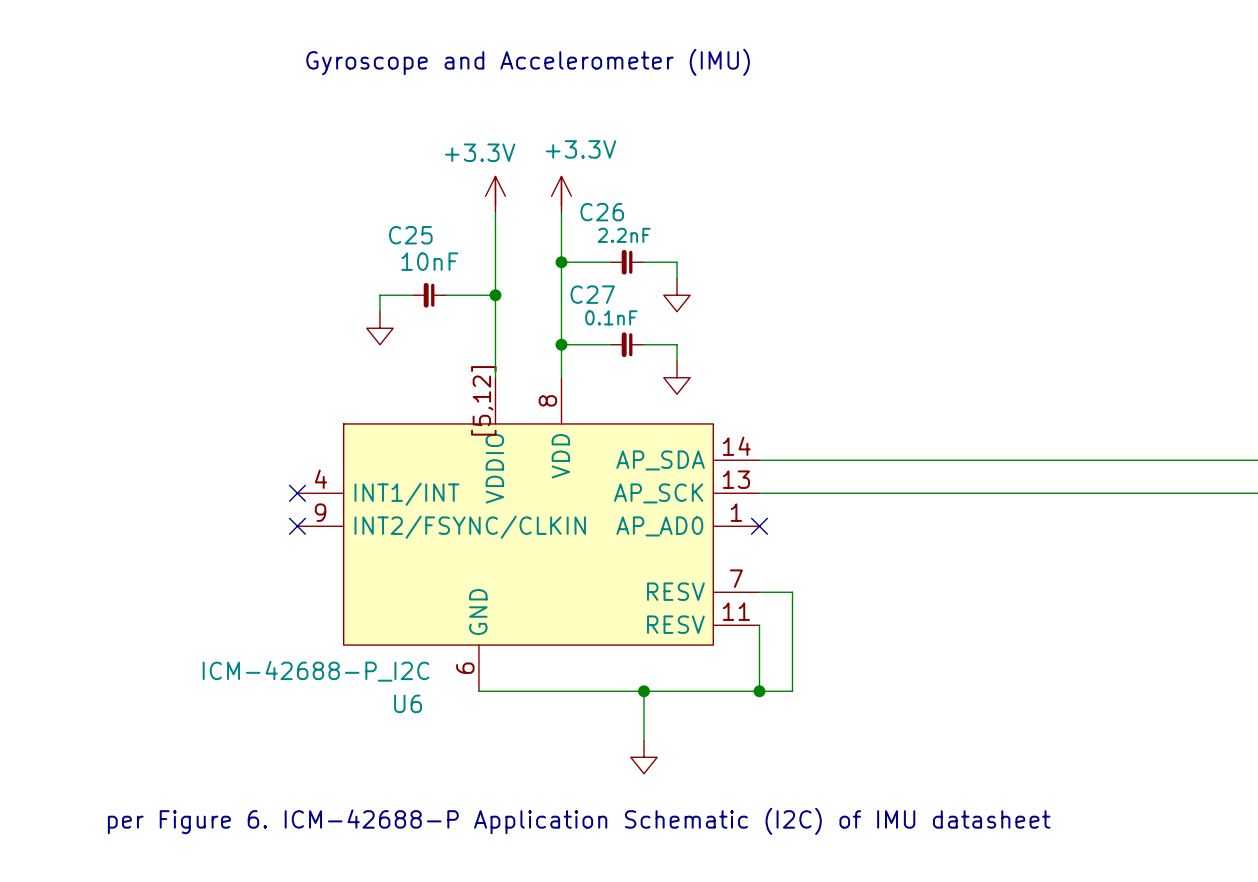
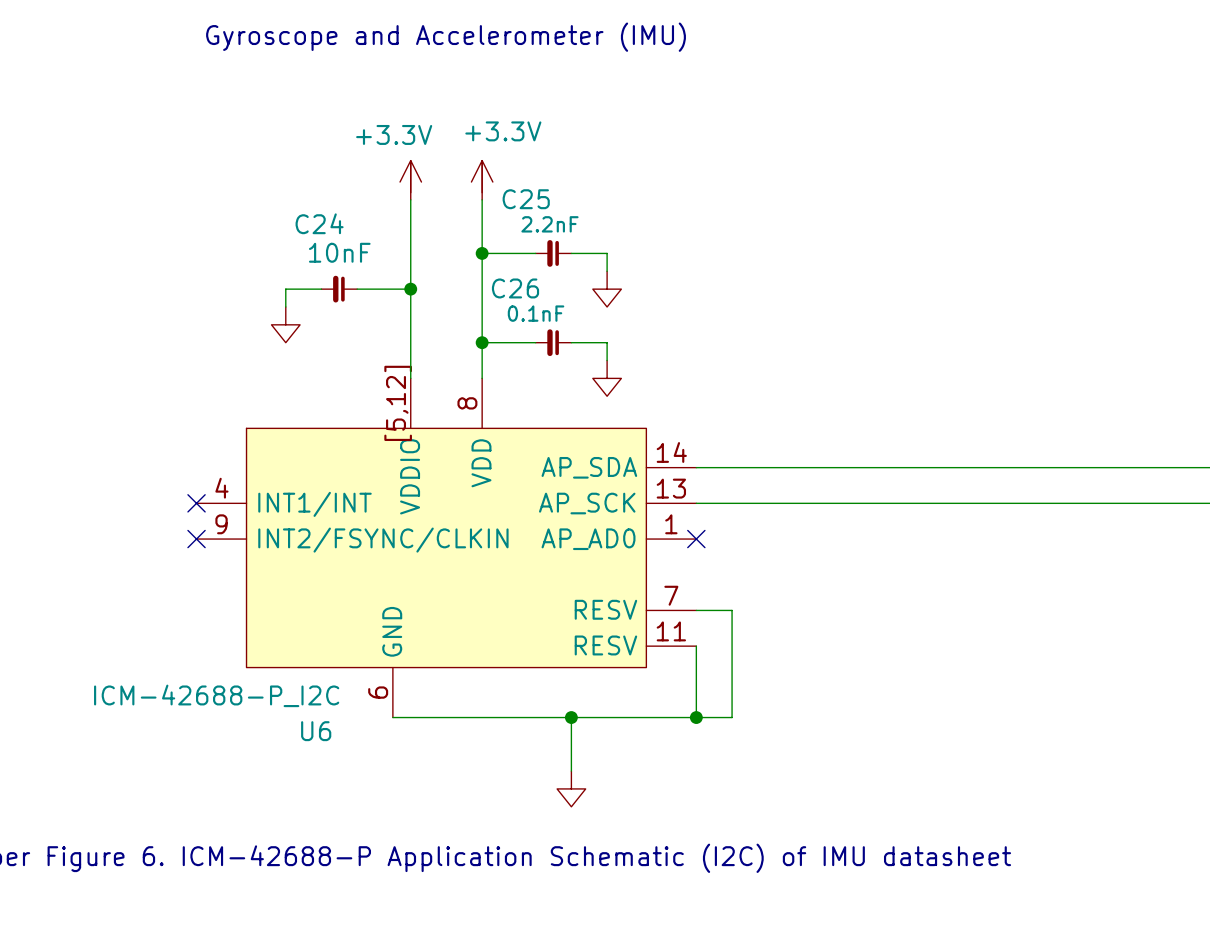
C26 name: C26 (602, 212) -> C25 (526, 199)
C25 name: C25 (410, 235) -> C24 (319, 223)
C27 name: C27 (592, 294) -> C26 (515, 288)

